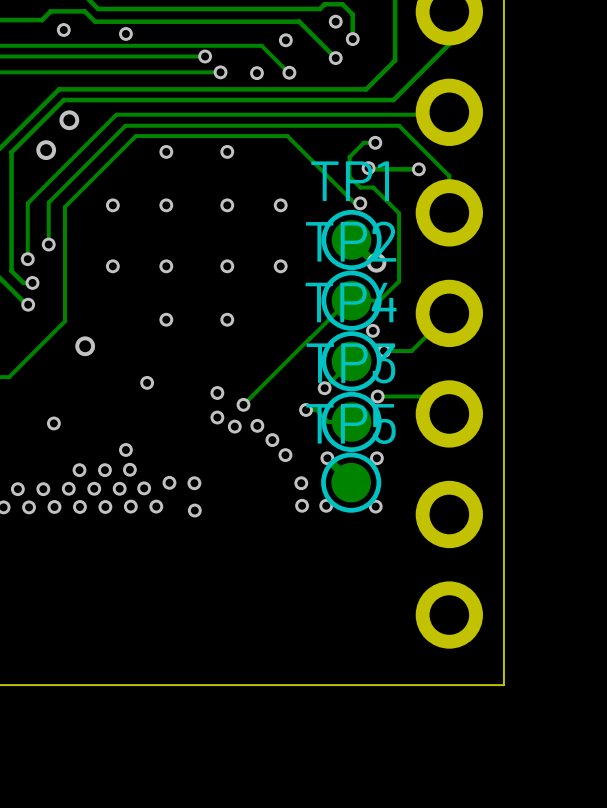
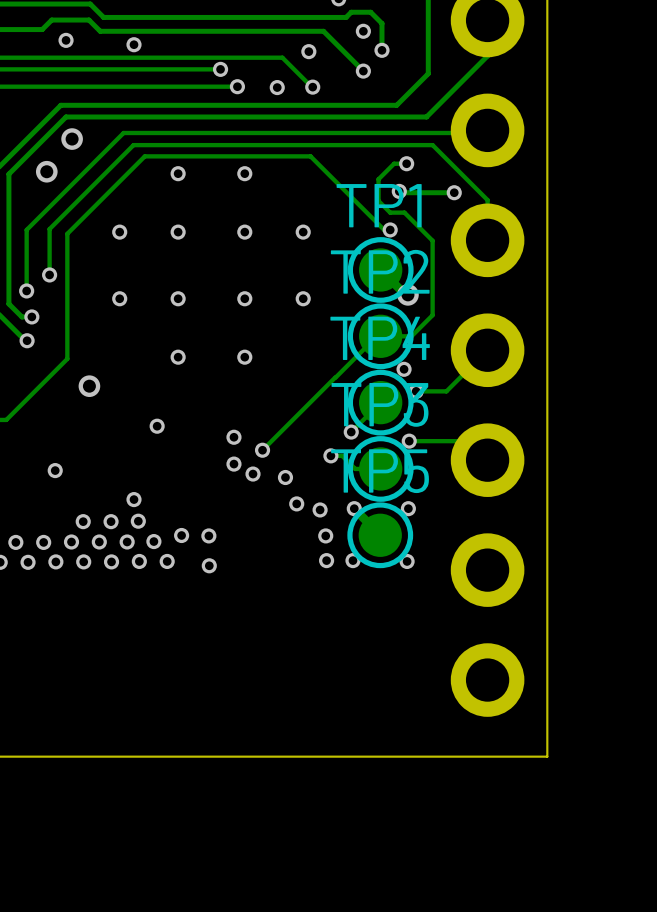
via: (257, 425) -> none
via: none -> (285, 477)
via: (272, 440) -> none
via: none -> (296, 503)
via: (285, 455) -> none
via: none -> (320, 509)

